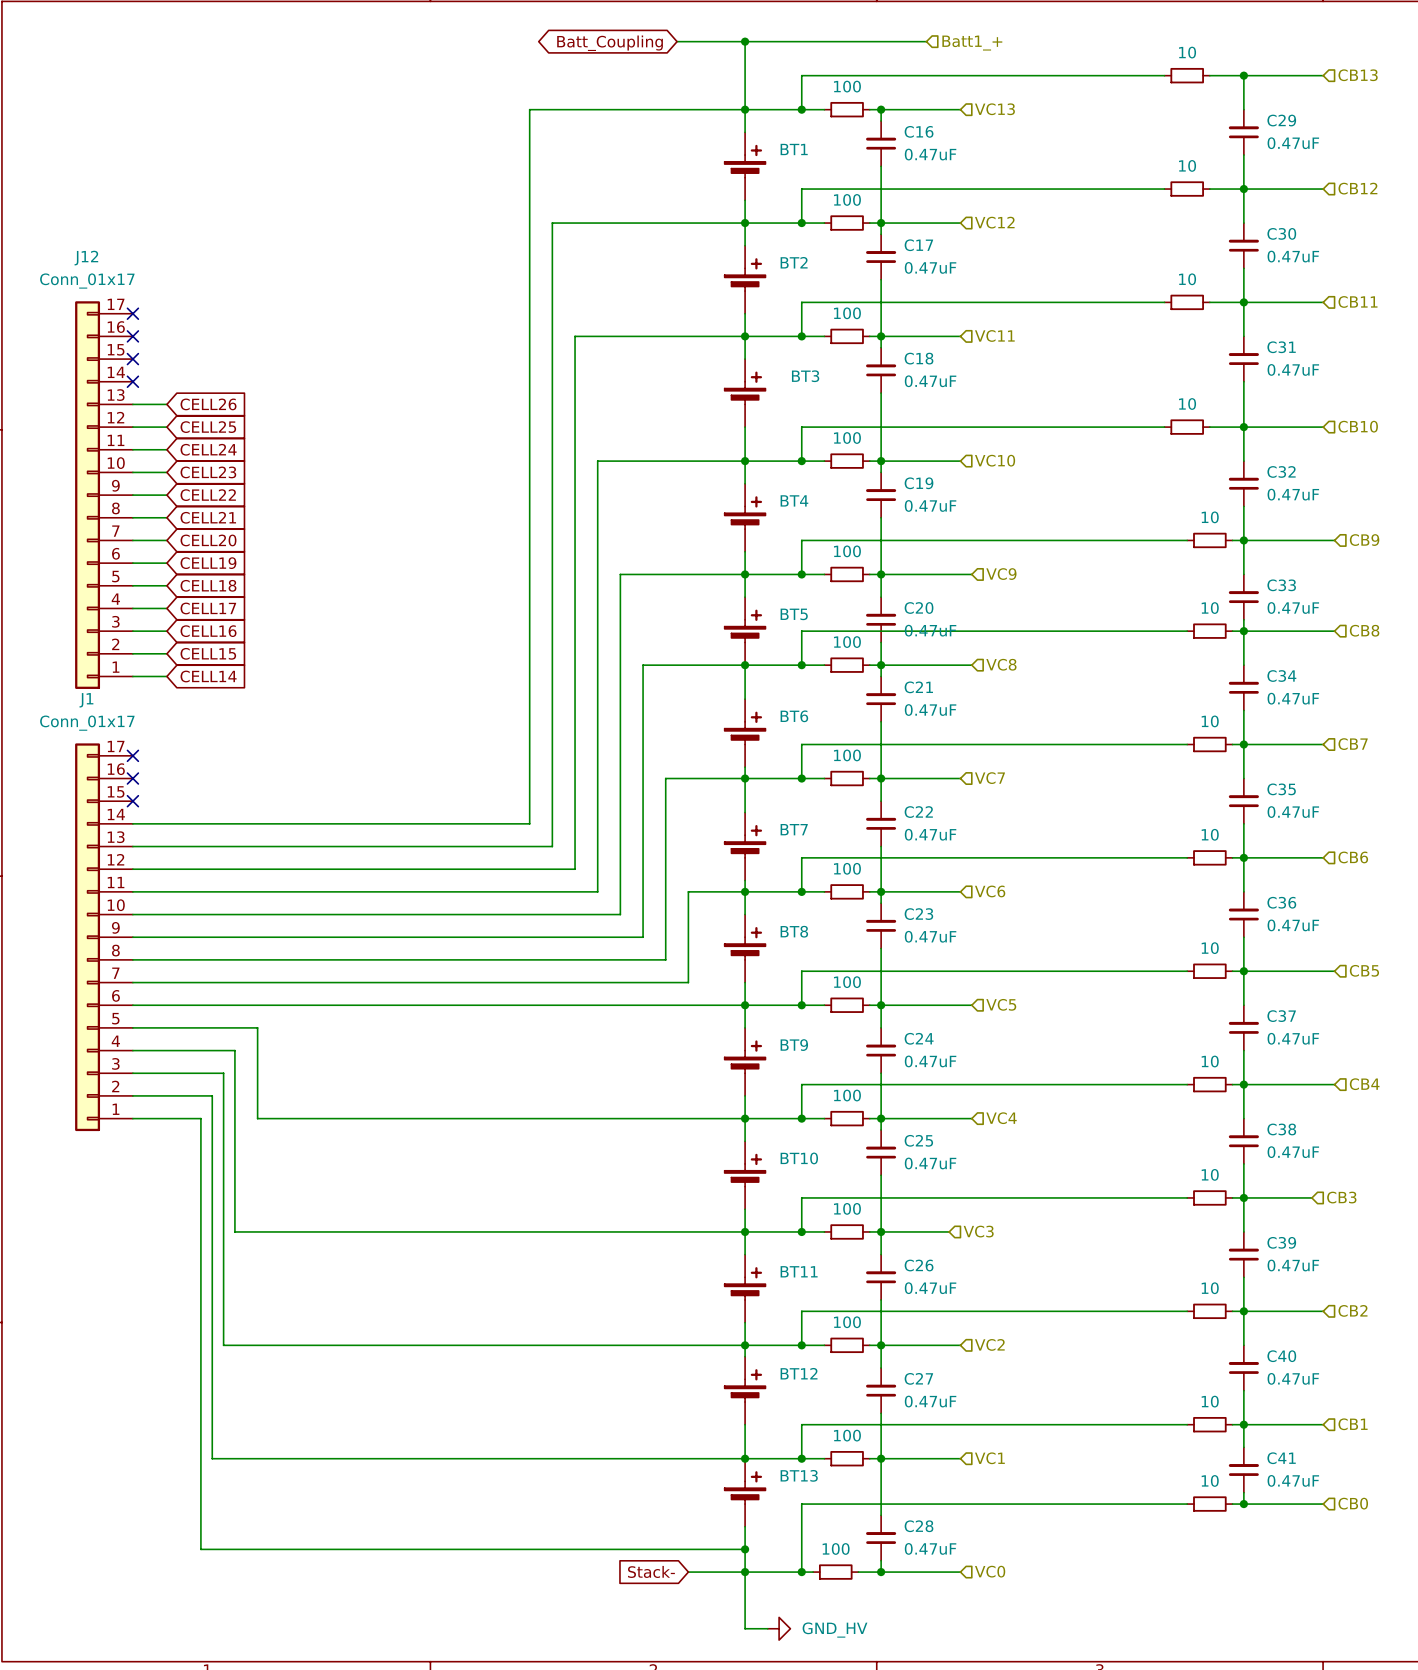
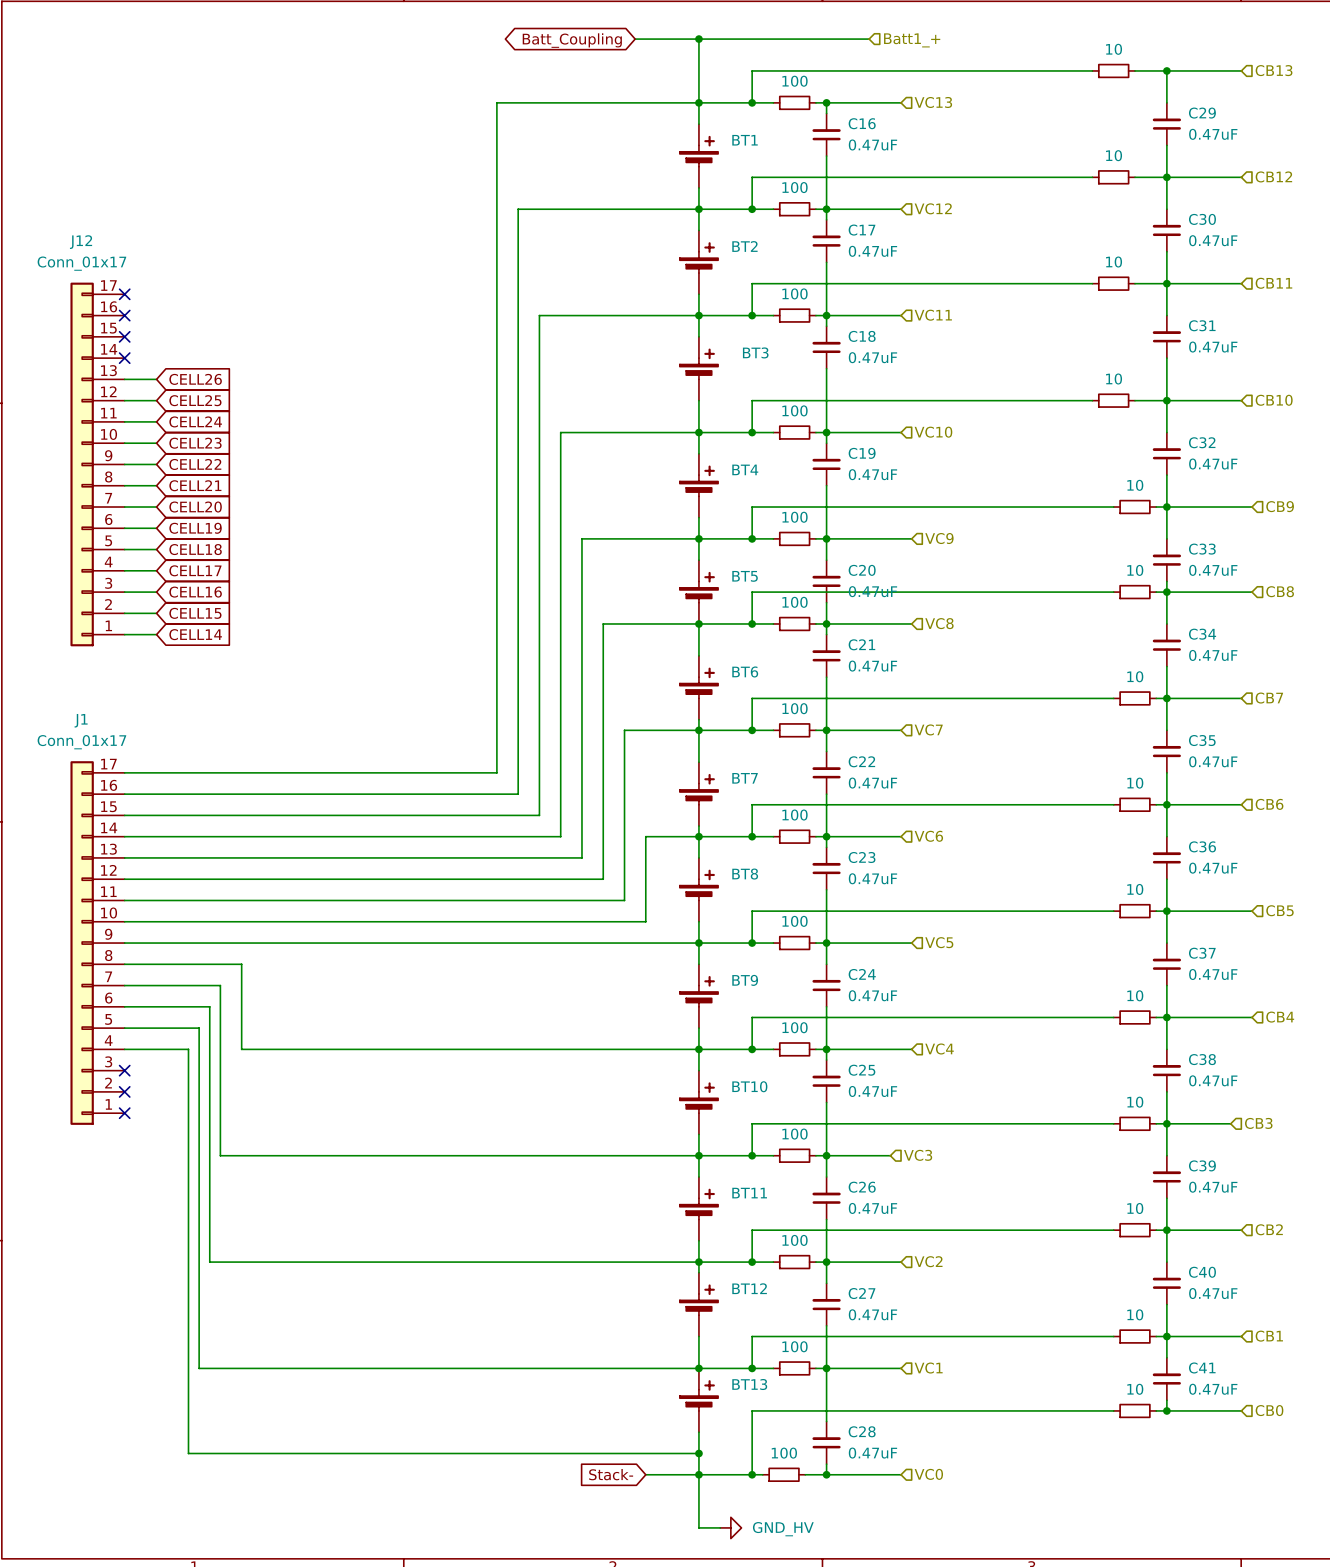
no-connect mark: (132, 755) -> none
no-connect mark: (132, 778) -> none
no-connect mark: (132, 801) -> none
J1 position: (104, 937) -> (97, 943)
no-connect mark: none -> (124, 1070)
no-connect mark: none -> (124, 1091)
no-connect mark: none -> (124, 1113)

